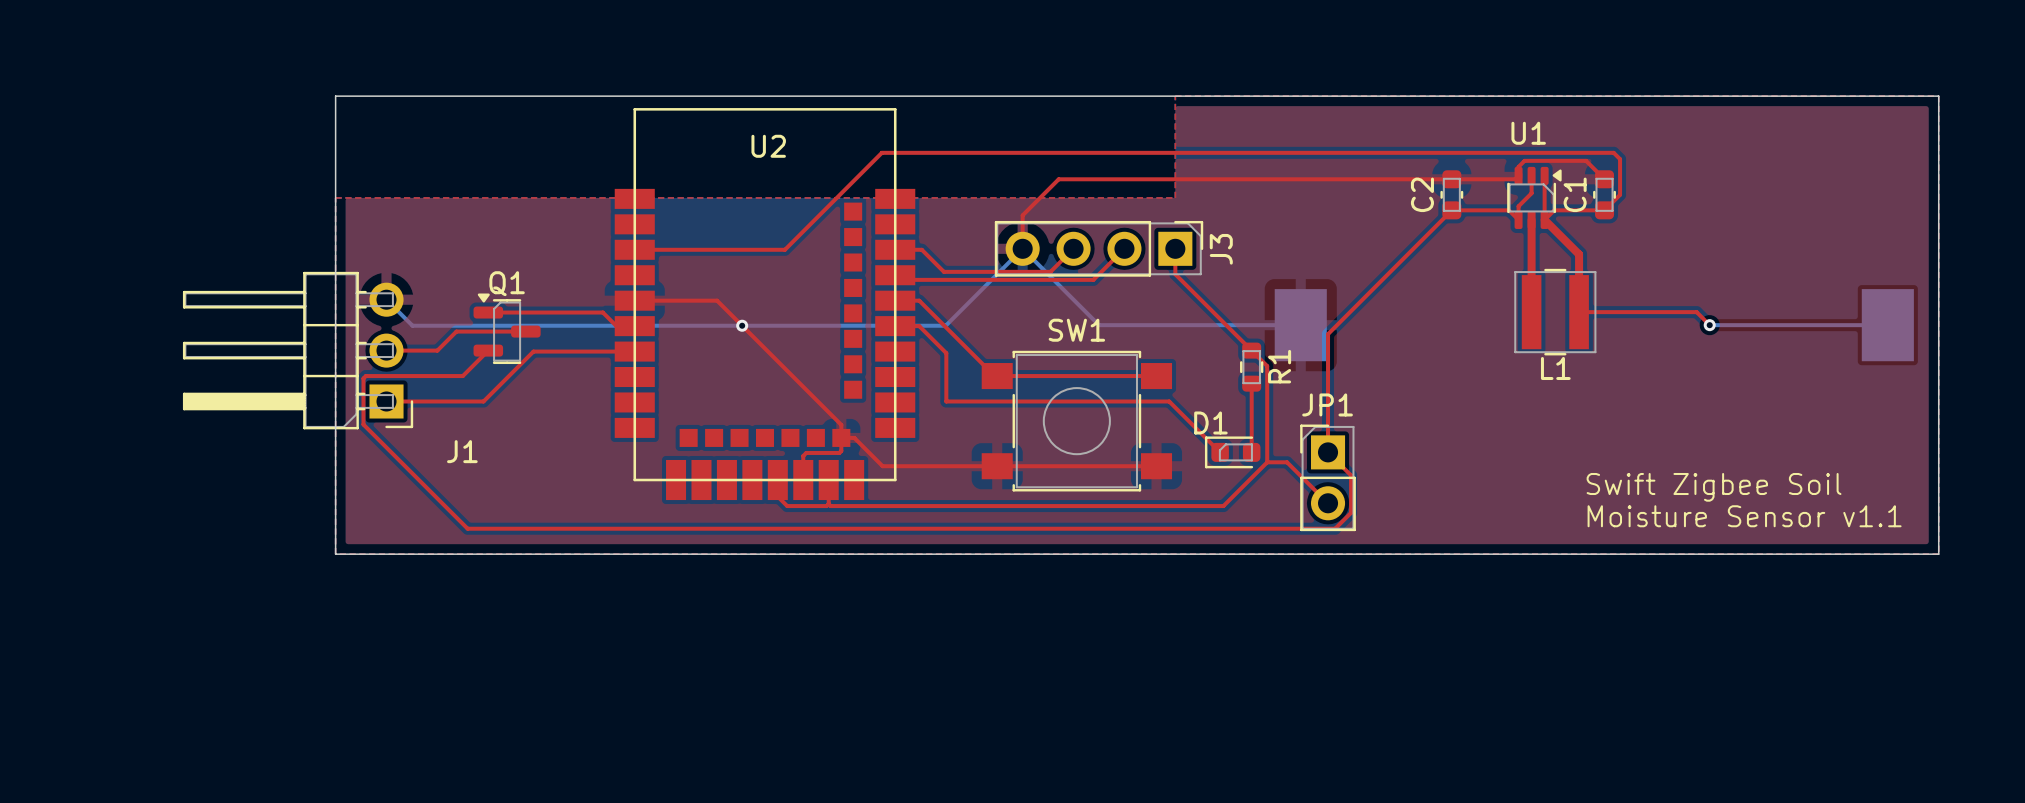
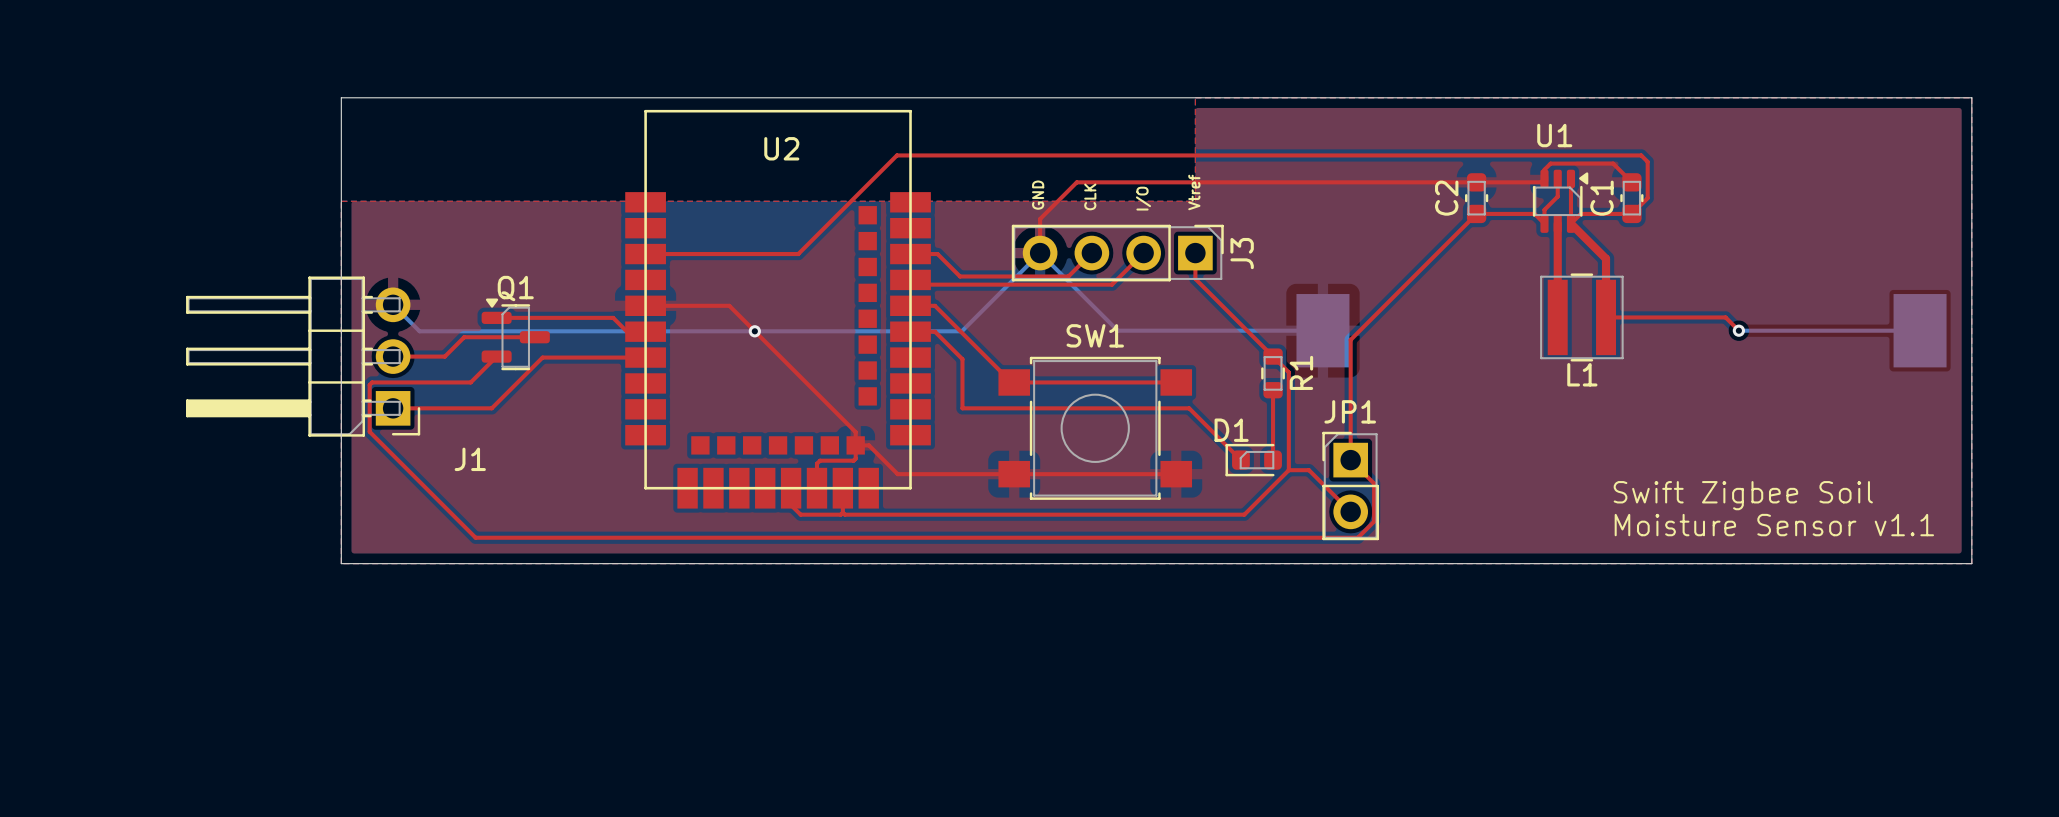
text: none -> Vtref (1194, 192)
text: none -> GND (1038, 195)
text: none -> CLK (1090, 196)
text: none -> I/O (1143, 198)

